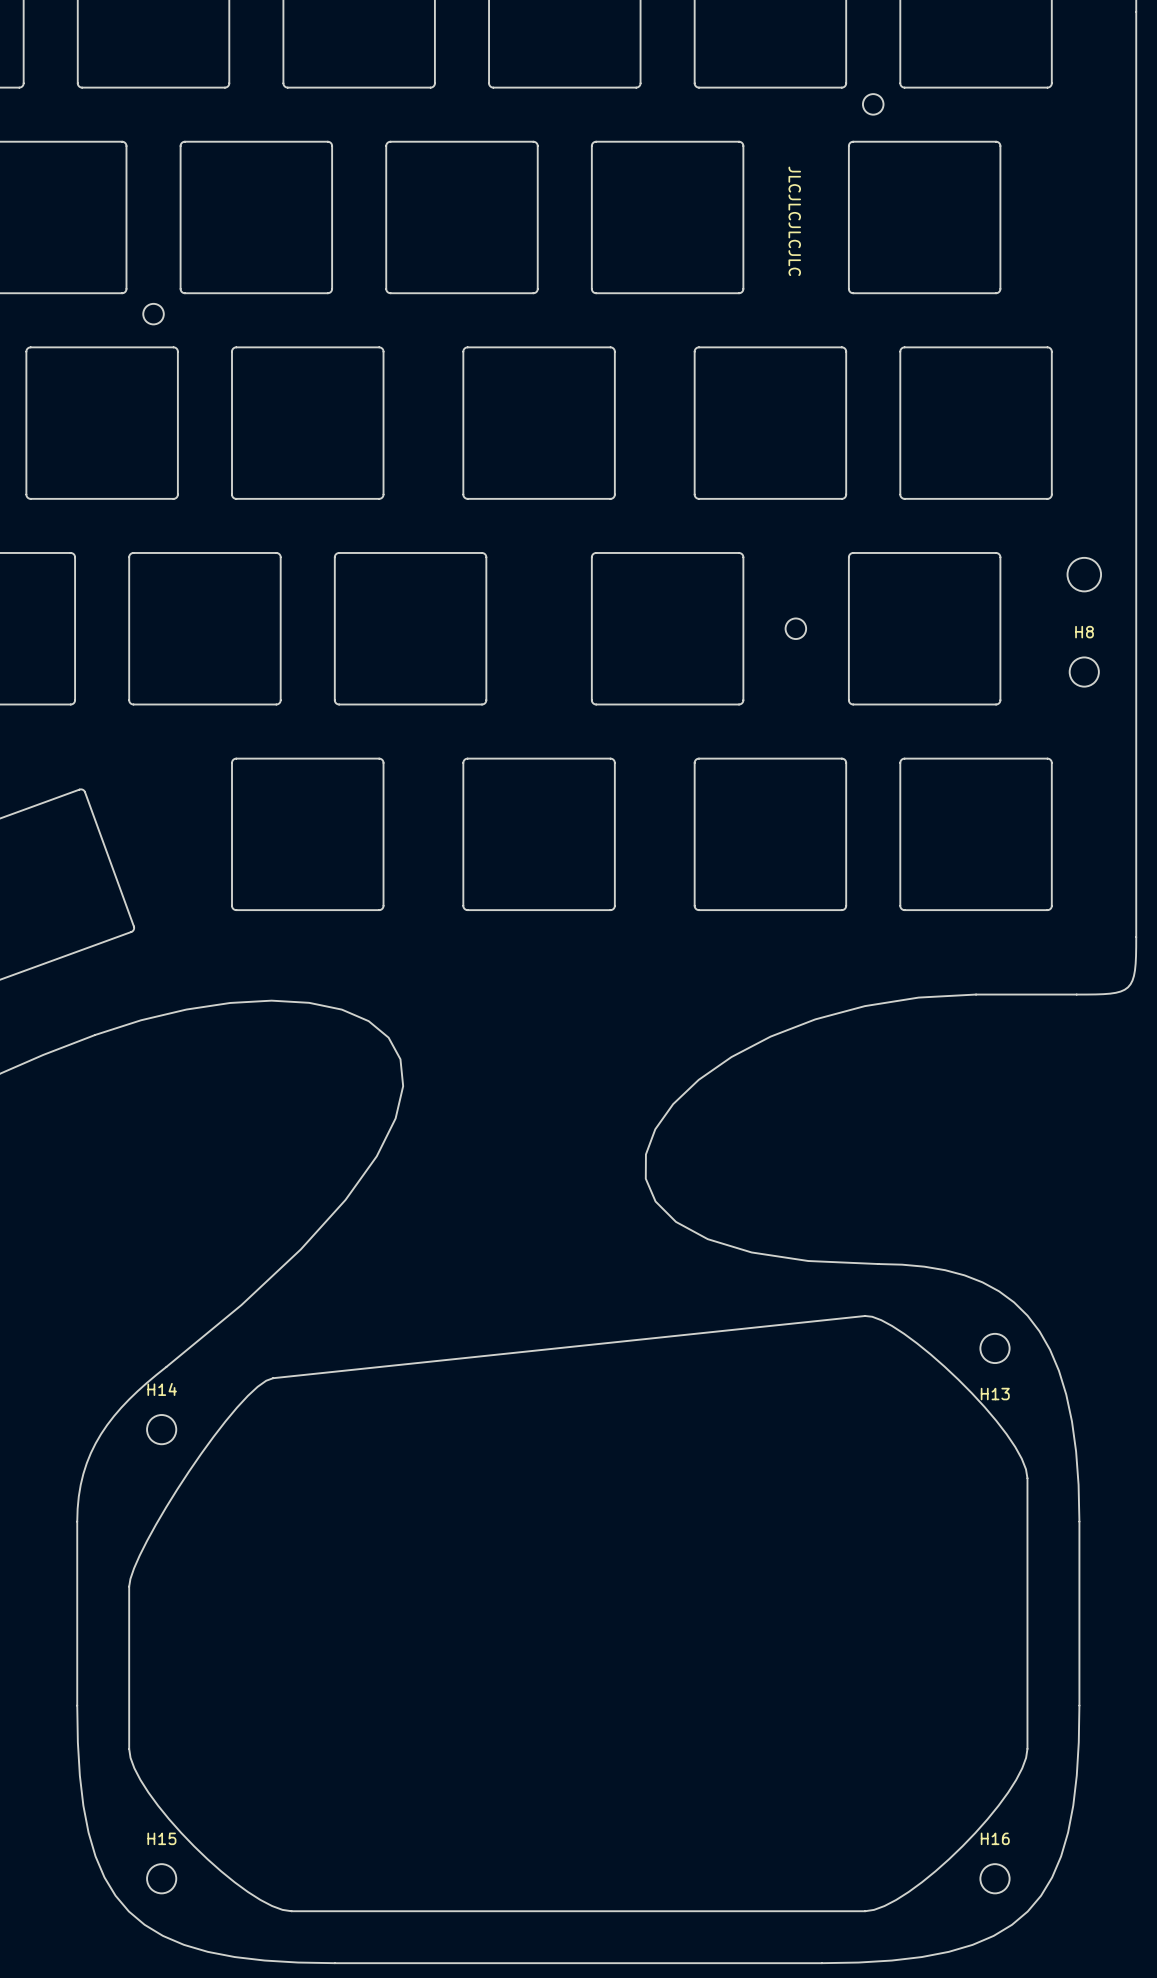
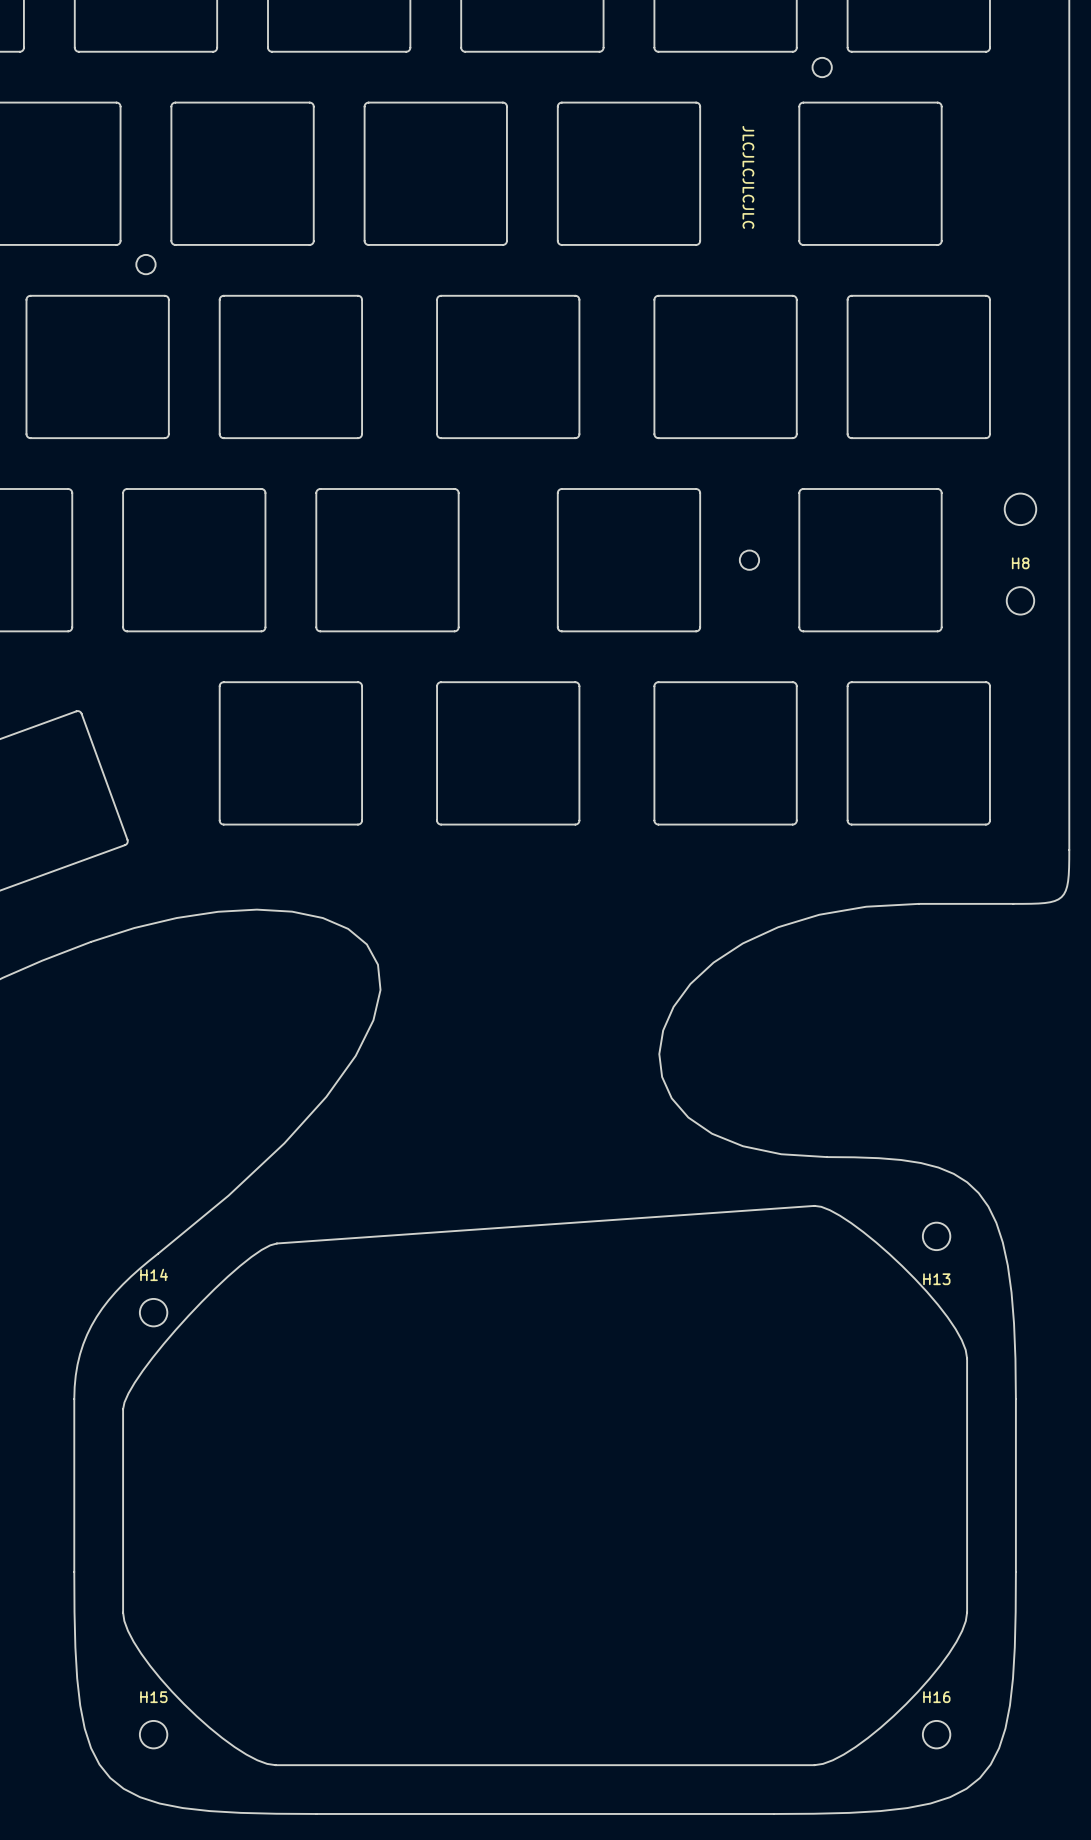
board edge: (976, 994) (918, 997) (864, 1006) (815, 1019) (770, 1036) (731, 1057) (698, 1079) (673, 1104) (655, 1129) (645, 1154) (645, 1178) (655, 1201) (676, 1221) (707, 1239) (751, 1252) (808, 1261) (902, 1264) (945, 1270) (982, 1282) (1014, 1302) (1039, 1331) (1050, 1349) (1066, 1394) (1076, 1451) (1079, 1521) -> (918, 903) (866, 906) (819, 914) (778, 927) (742, 943) (713, 962) (690, 983) (673, 1006) (663, 1030) (659, 1054) (662, 1076) (671, 1098) (688, 1117) (712, 1133) (742, 1146) (781, 1154) (878, 1158) (920, 1163) (953, 1173) (967, 1182) (978, 1193) (988, 1206) (1002, 1242) (1011, 1292) (1015, 1399)
board edge: (1027, 1478) (1026, 1469) (1015, 1446) (996, 1420) (971, 1393) (917, 1343) (892, 1325) (872, 1316) (865, 1315) (273, 1378) (266, 1380) (247, 1395) (201, 1453) (147, 1540) (134, 1568) (129, 1586) -> (967, 1358) (965, 1349) (955, 1329) (937, 1304) (914, 1278) (863, 1232) (839, 1215) (821, 1206) (276, 1243) (251, 1256) (214, 1288) (175, 1329) (142, 1370) (124, 1402) (123, 1460)
board edge: (77, 1705) (79, 1775) (88, 1832) (104, 1877) (115, 1895) (128, 1911) (144, 1924) (162, 1935) (207, 1951) (264, 1960) (334, 1963) -> (74, 1571) (75, 1647) (80, 1705) (91, 1748) (99, 1764) (110, 1778) (123, 1788) (140, 1797) (182, 1808) (240, 1812) (316, 1813)
board edge: (1079, 1705) (1076, 1775) (1068, 1832) (1052, 1877) (1041, 1895) (1027, 1911) (1012, 1924) (993, 1935) (948, 1951) (891, 1960) (821, 1963) -> (1015, 1571) (1014, 1647) (1009, 1705) (999, 1748) (990, 1764) (979, 1778) (966, 1788) (950, 1797) (907, 1808) (849, 1812) (773, 1813)

